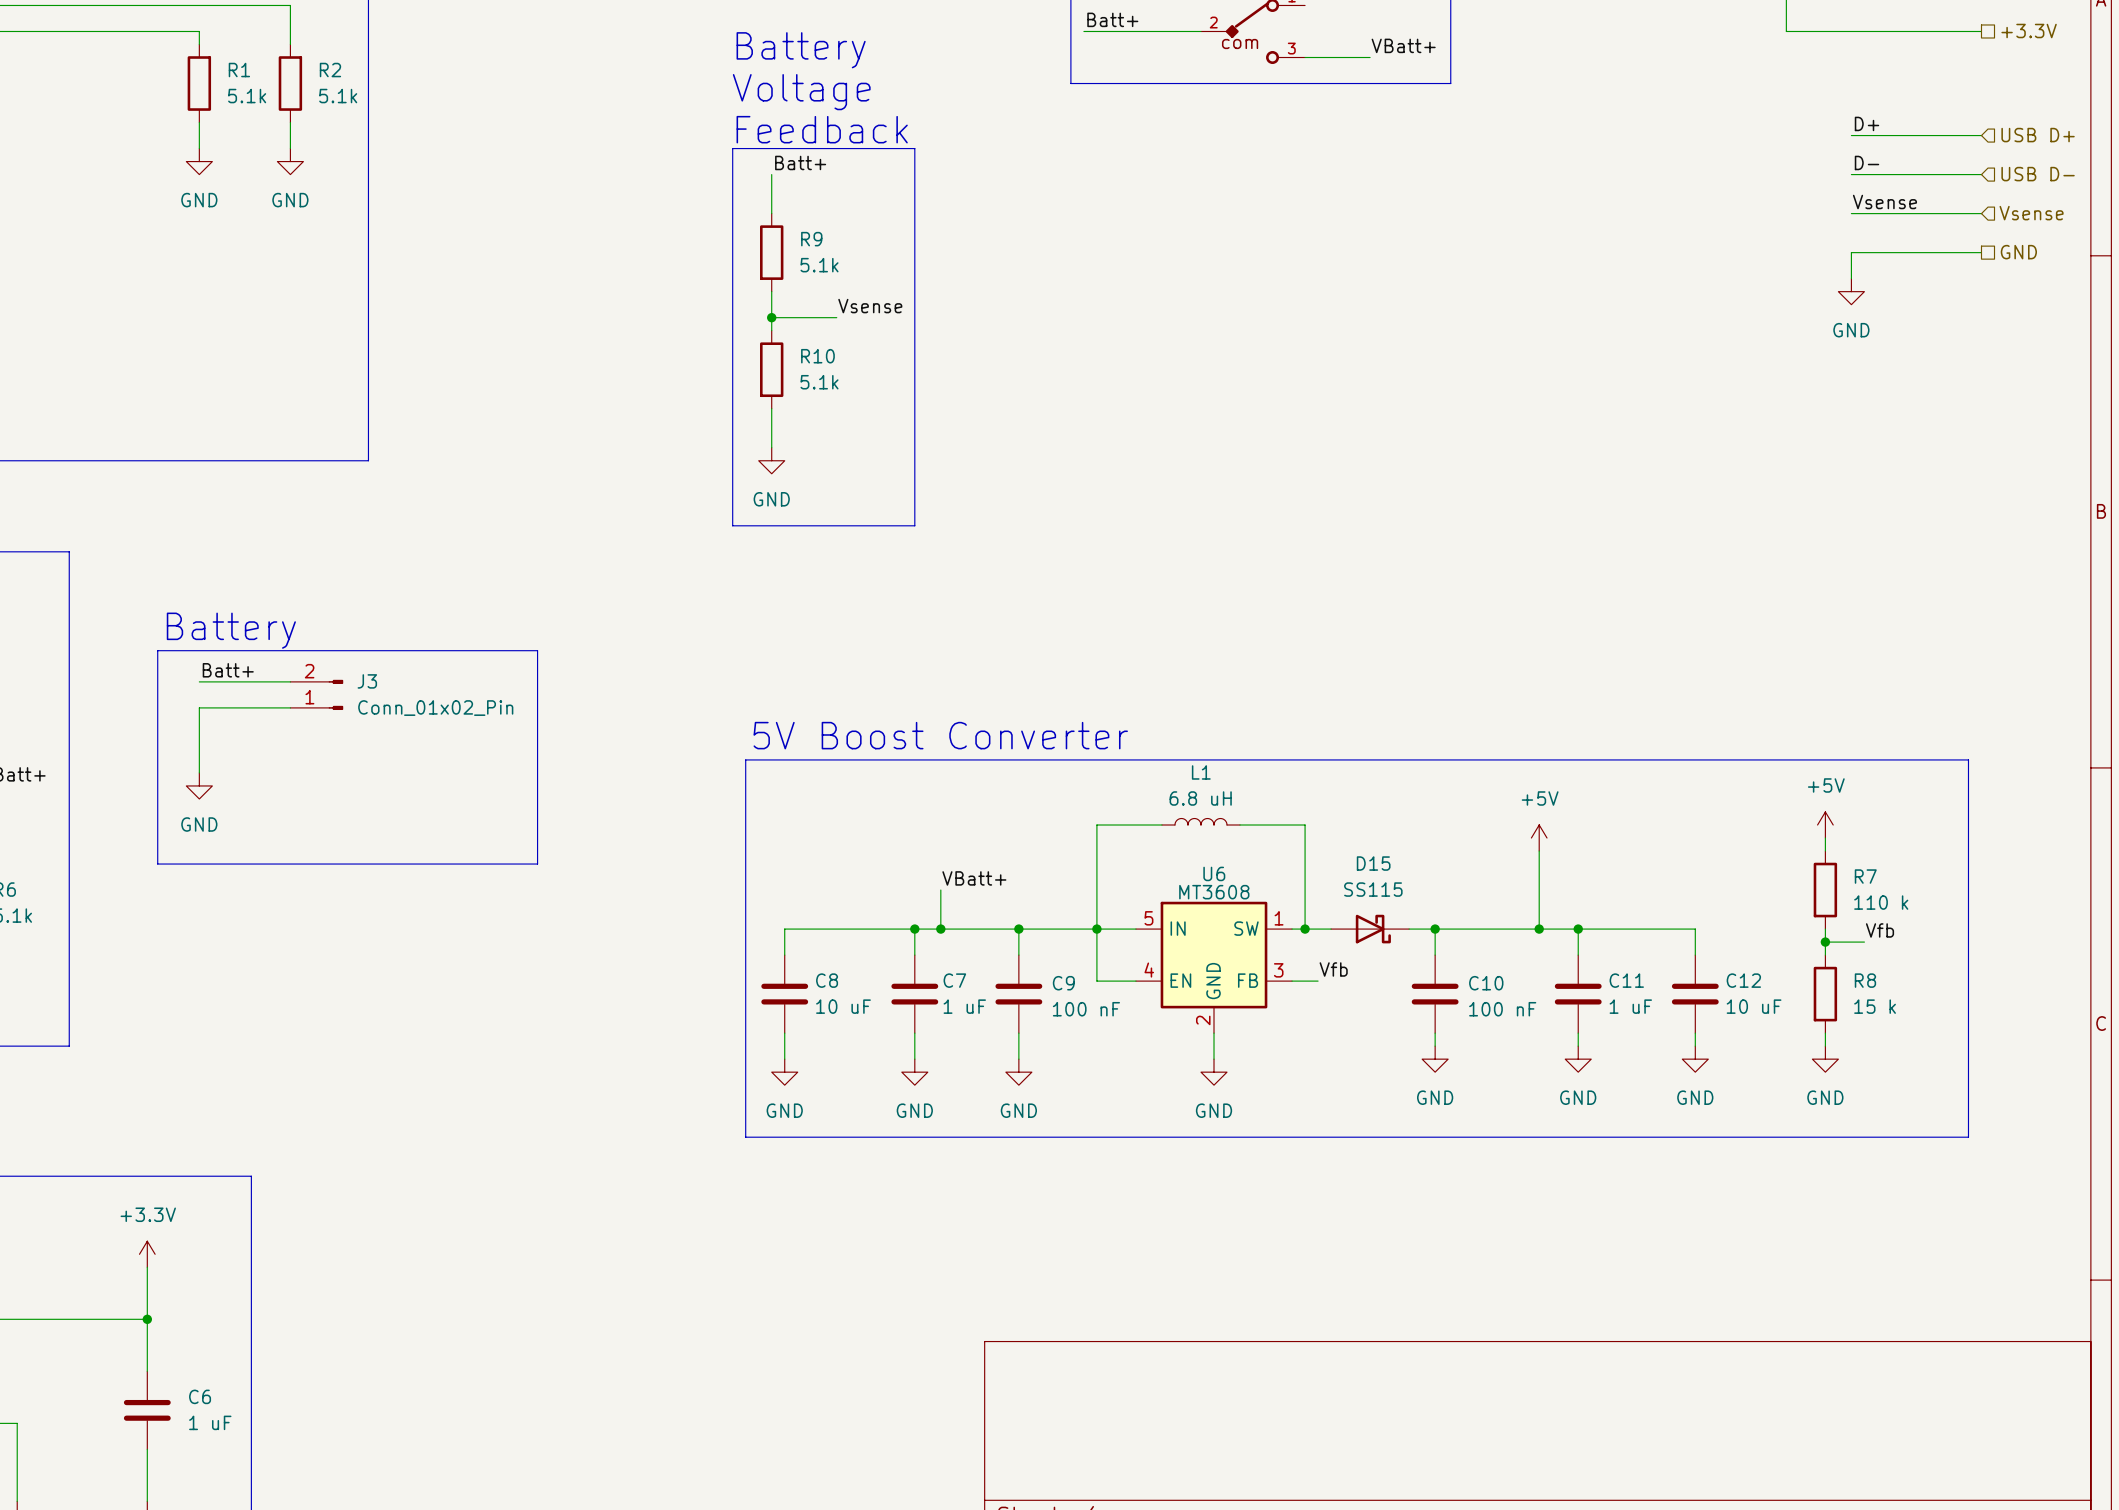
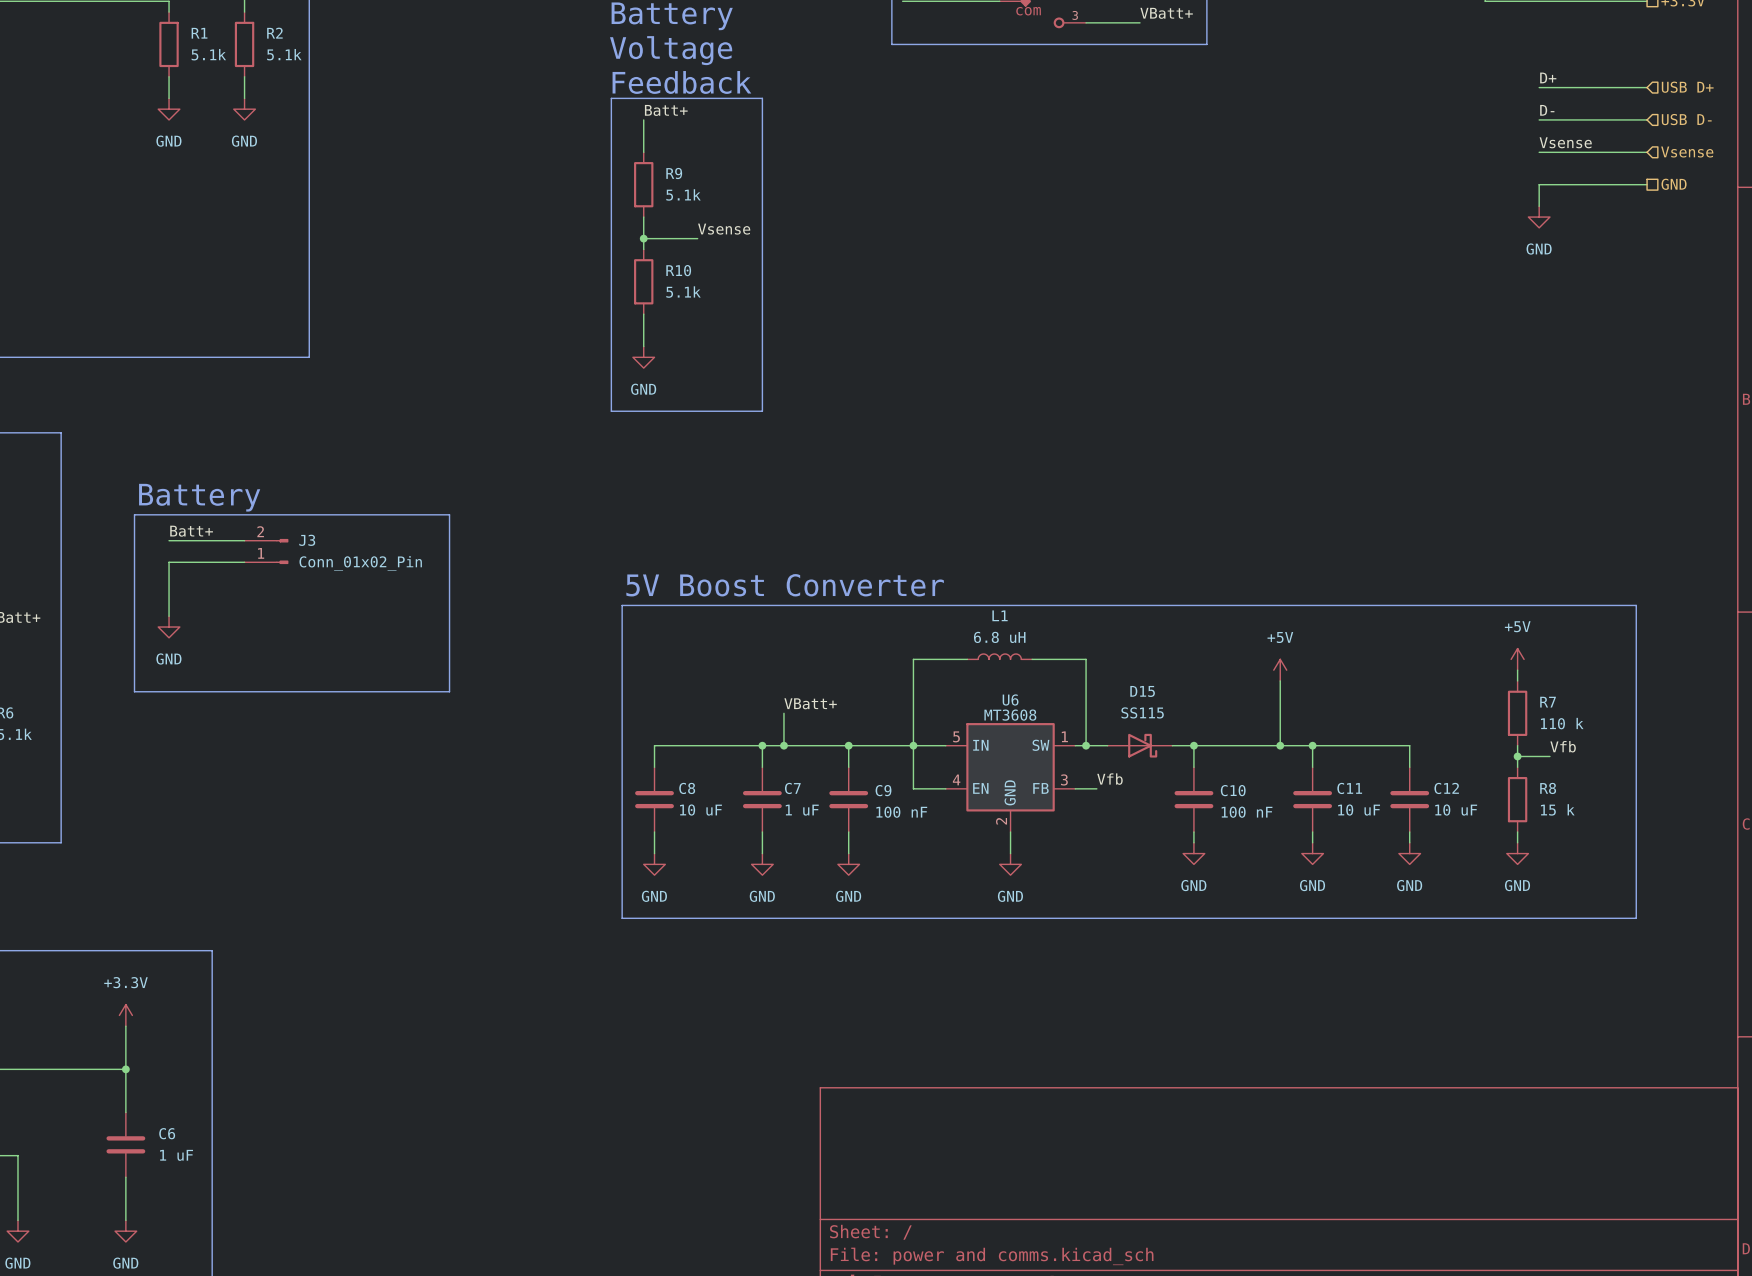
C11 value: 1 uF (1630, 1006) -> 10 uF (1359, 810)

